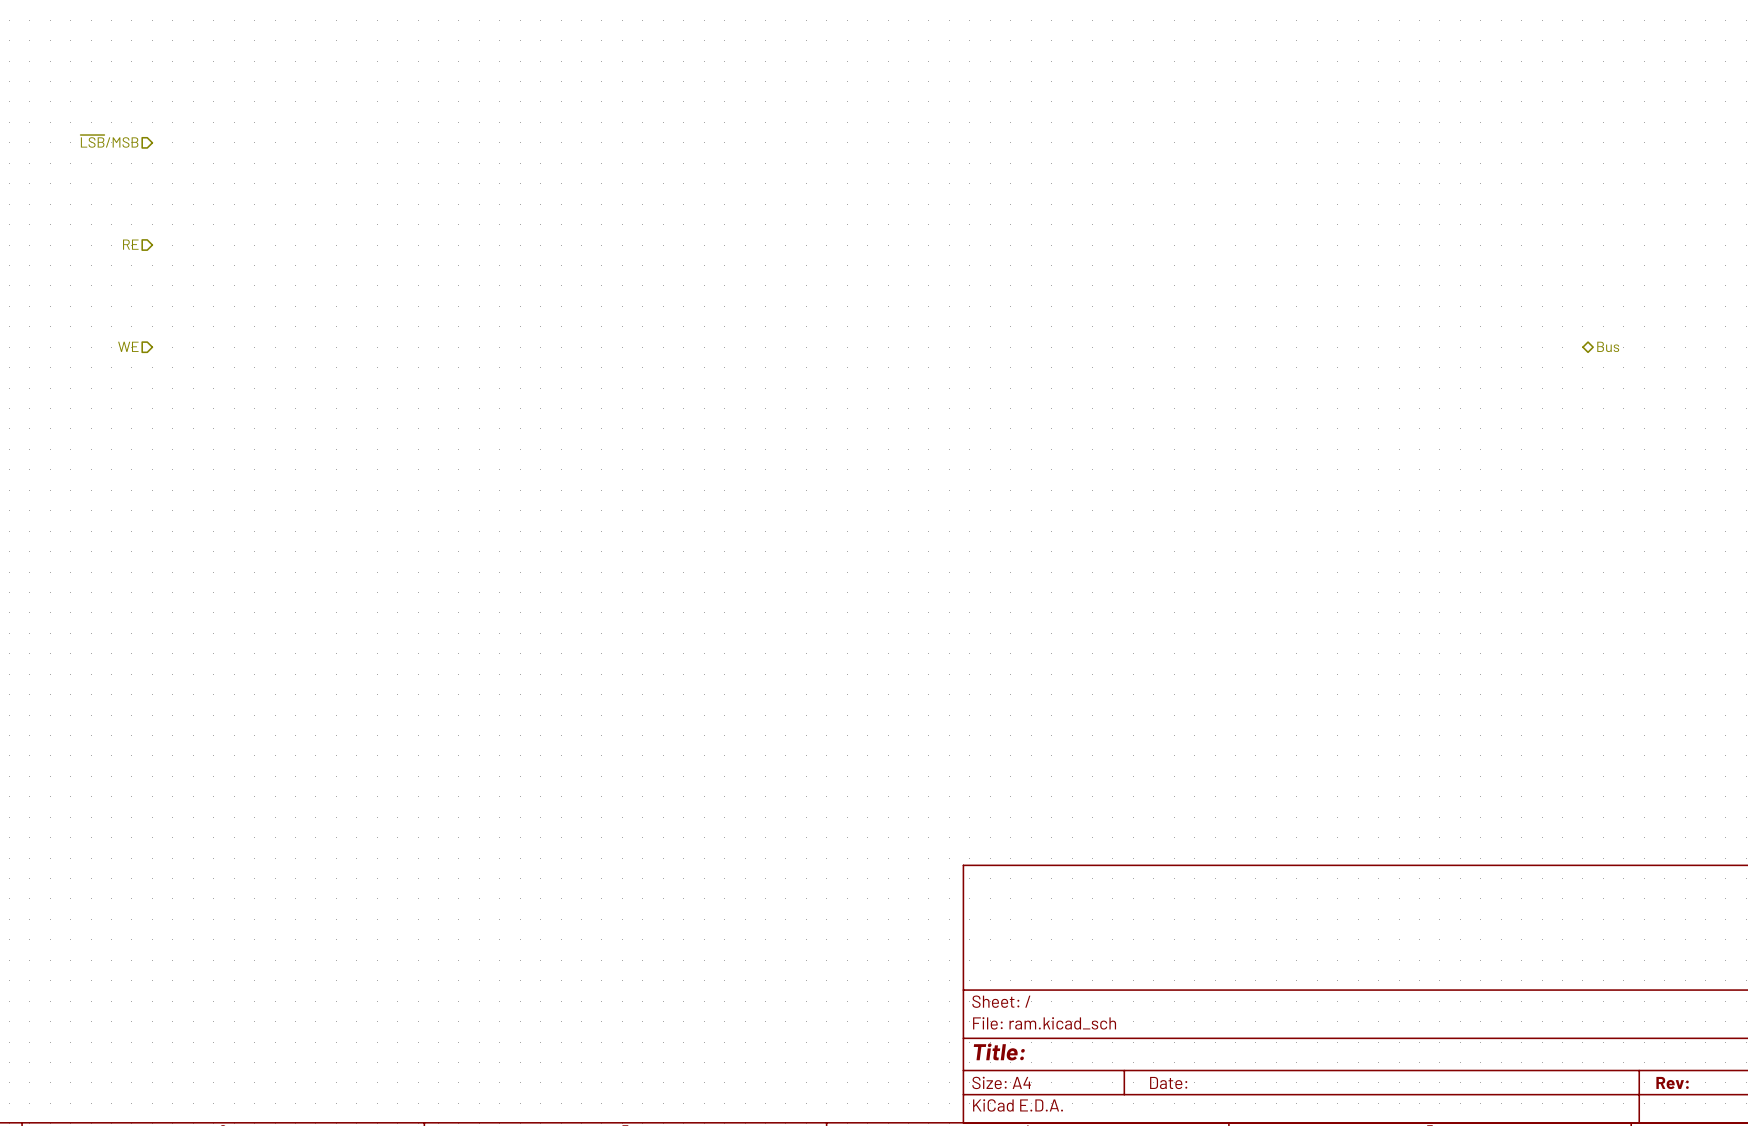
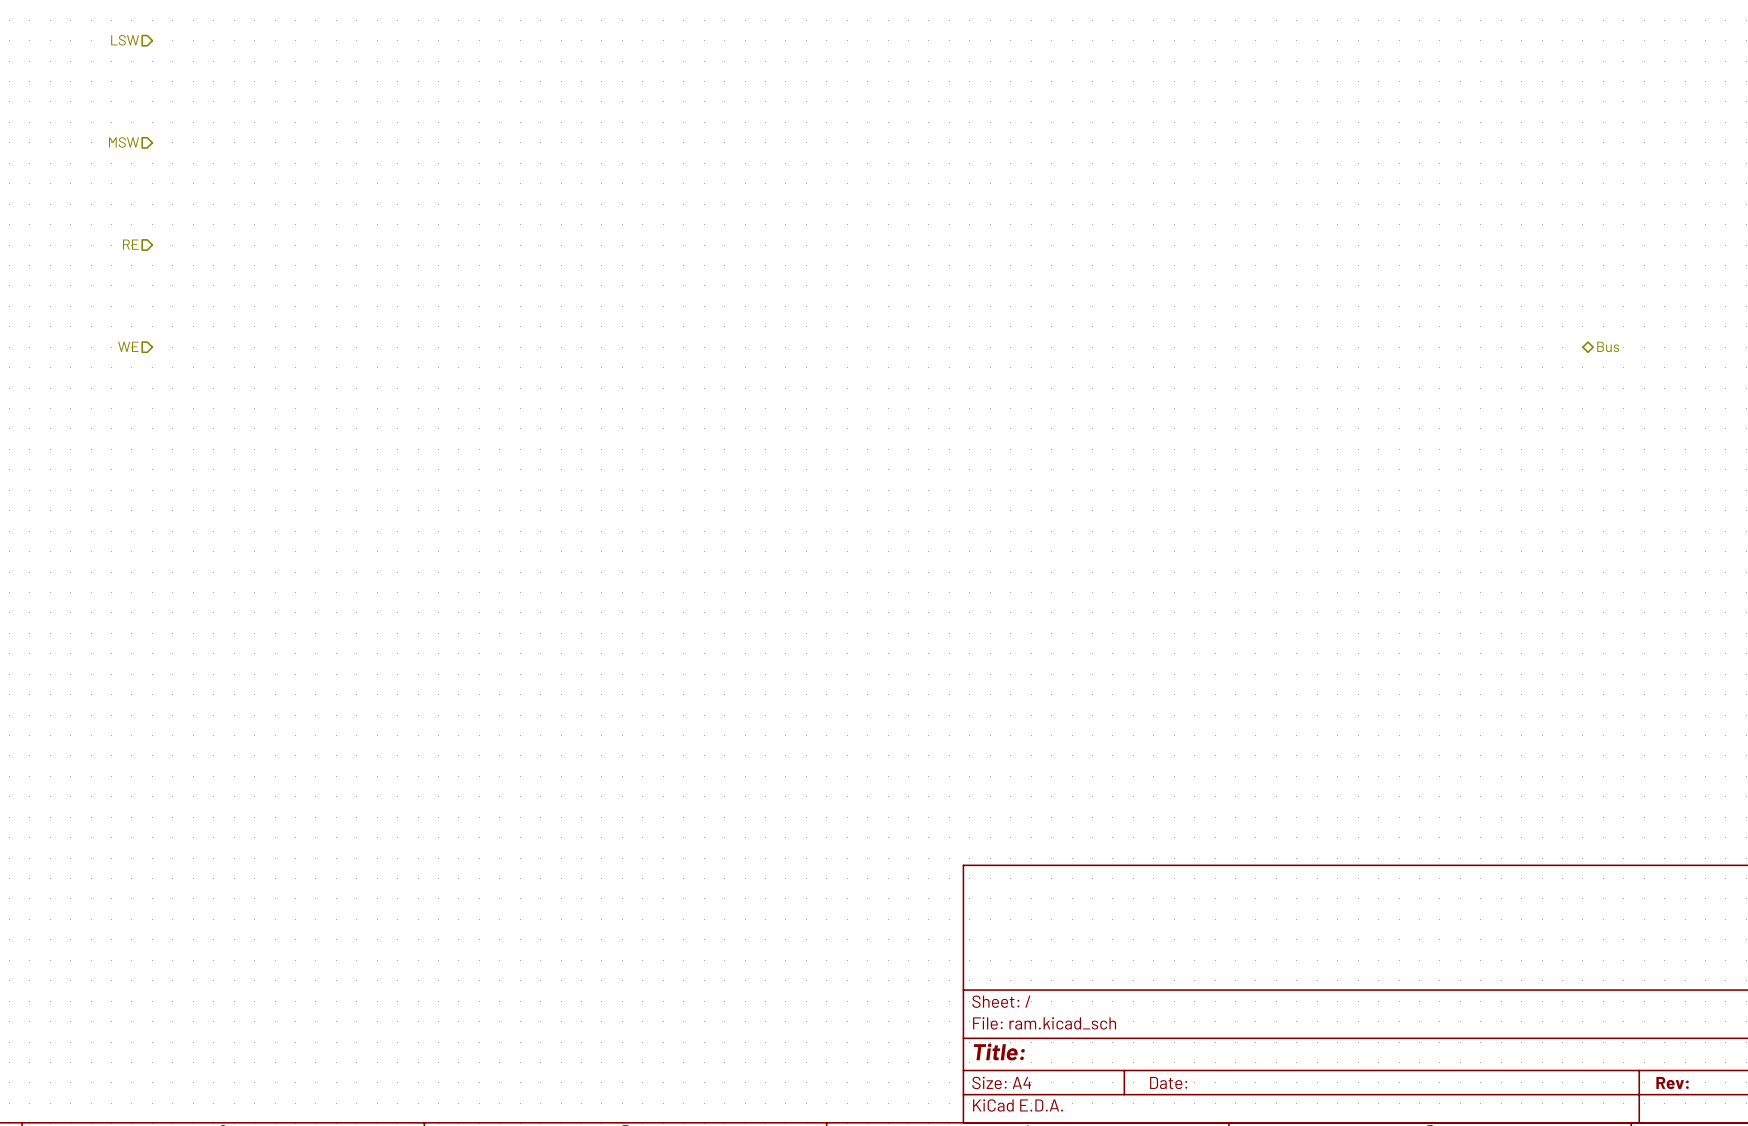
hierarchical label: none -> LSW (125, 40)
hierarchical label: ~{LSB}/MSB (109, 141) -> MSW (124, 142)

